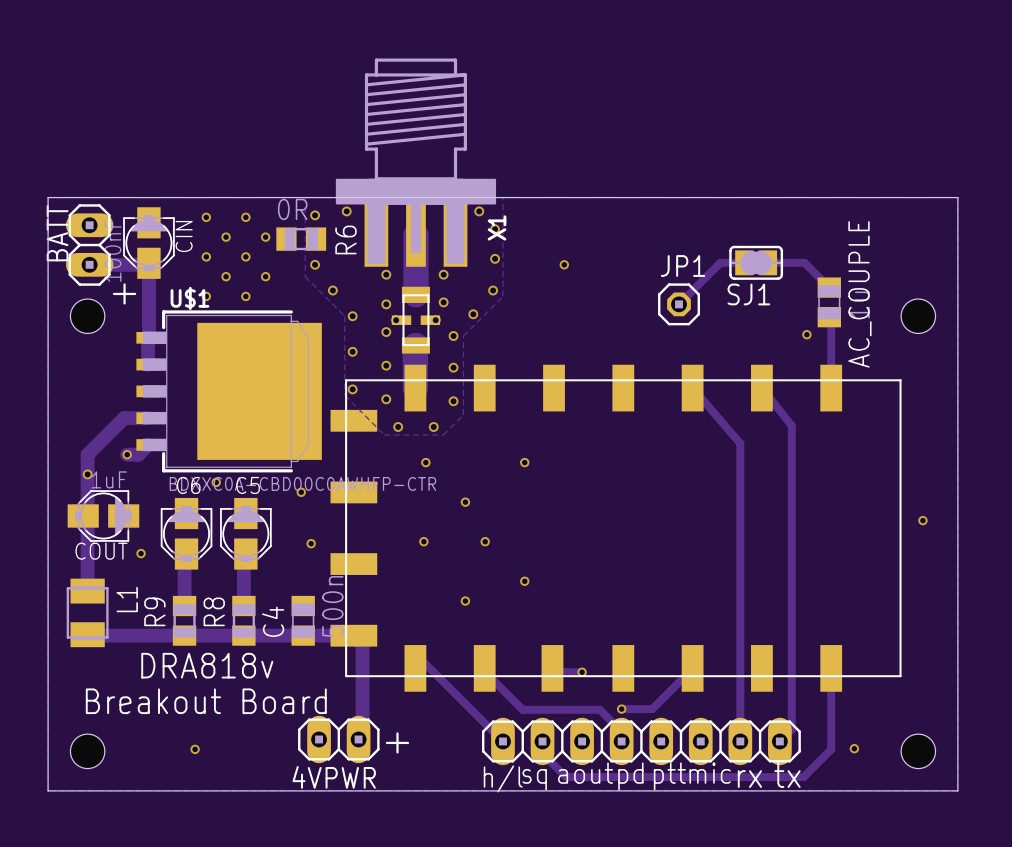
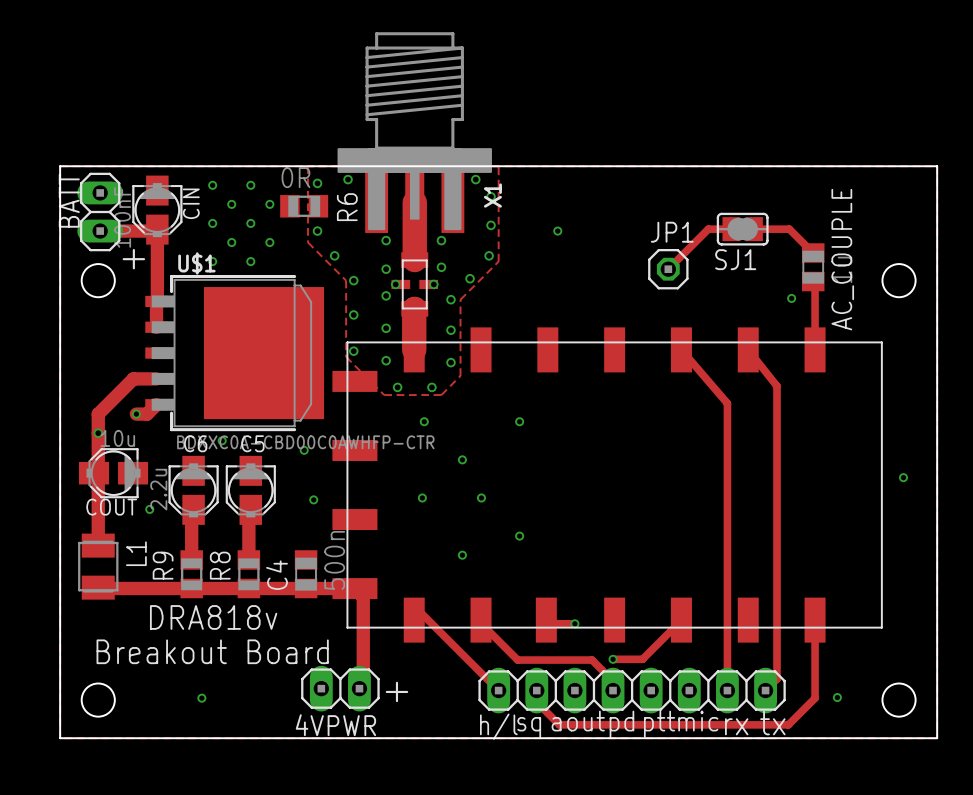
COUT value: 1uF (109, 479) -> 10u (117, 438)
C6 value: none -> 2.2u (158, 489)

